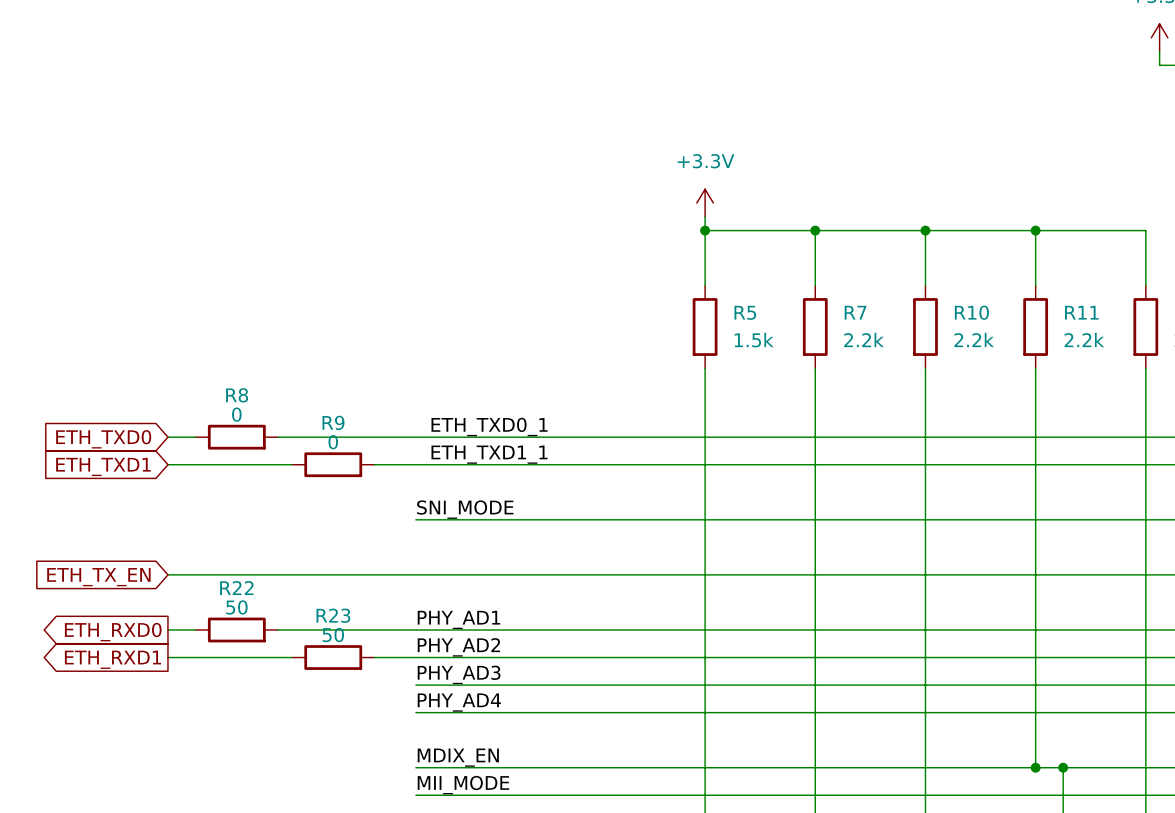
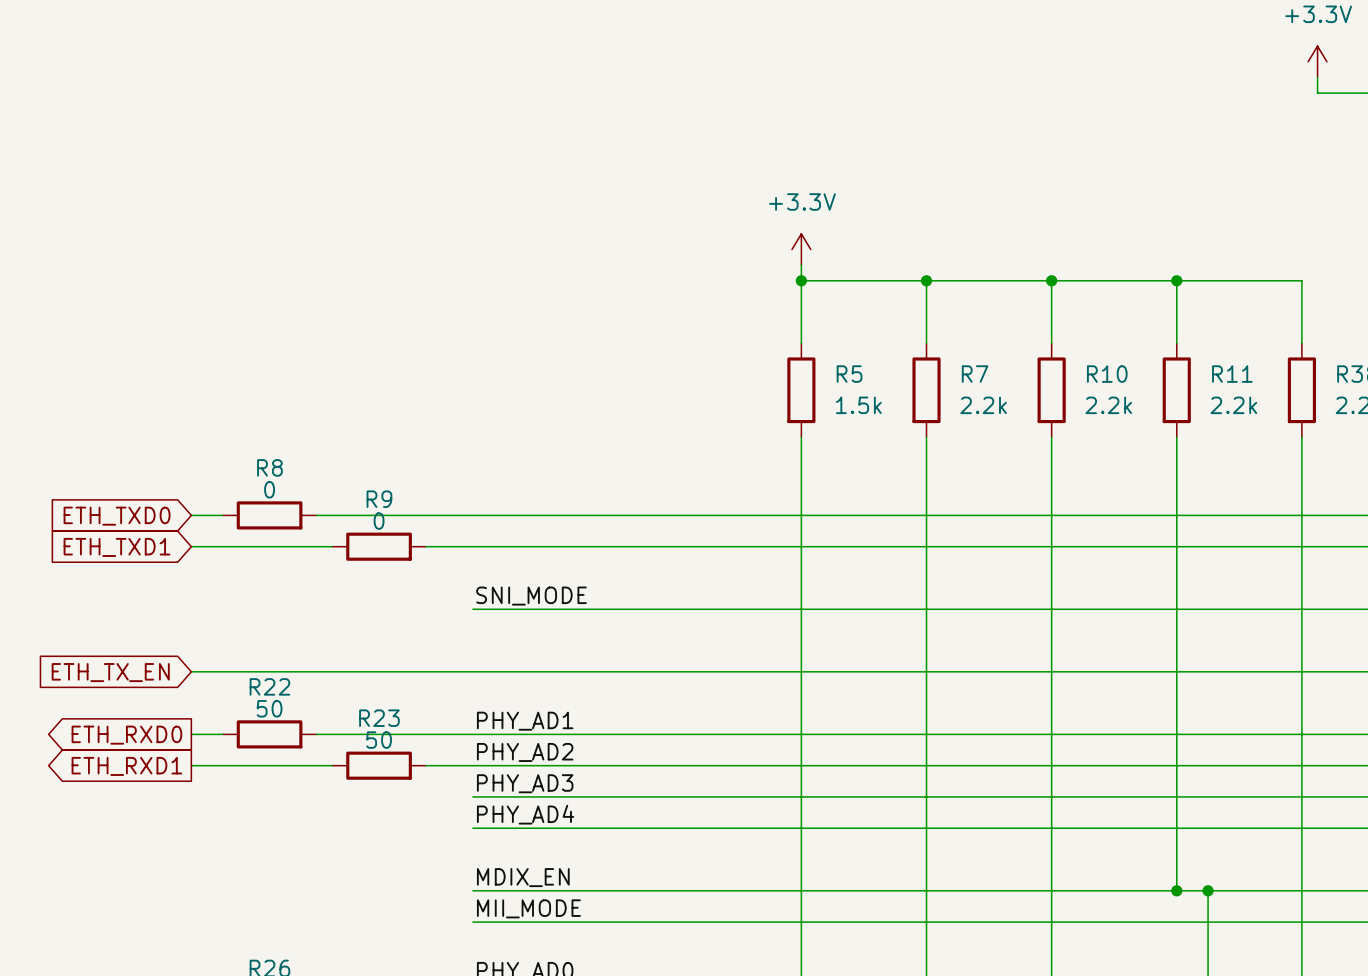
label: ETH_TXD0_1 (489, 426) -> none
label: ETH_TXD1_1 (489, 454) -> none

